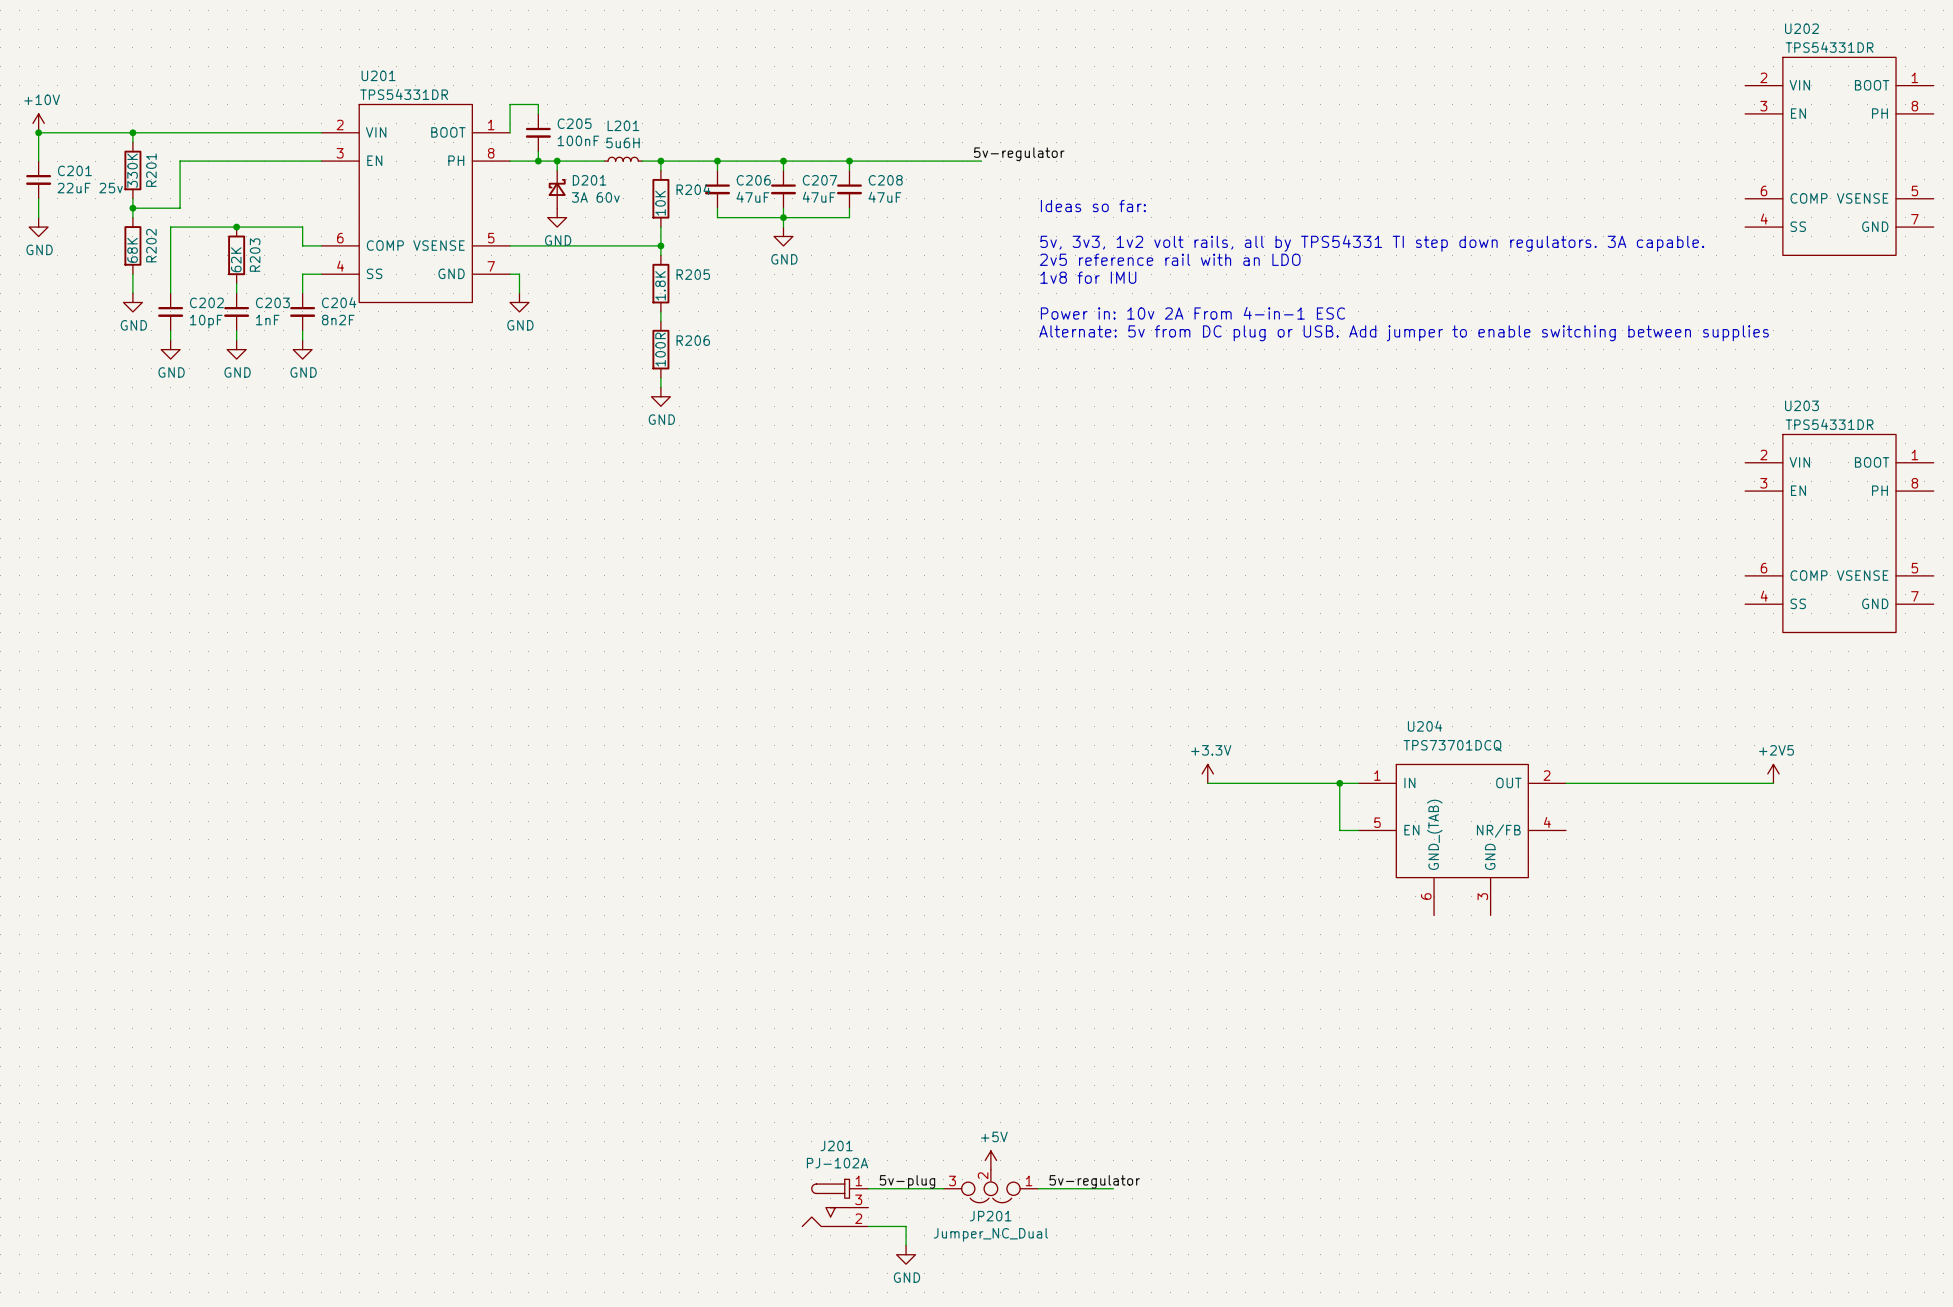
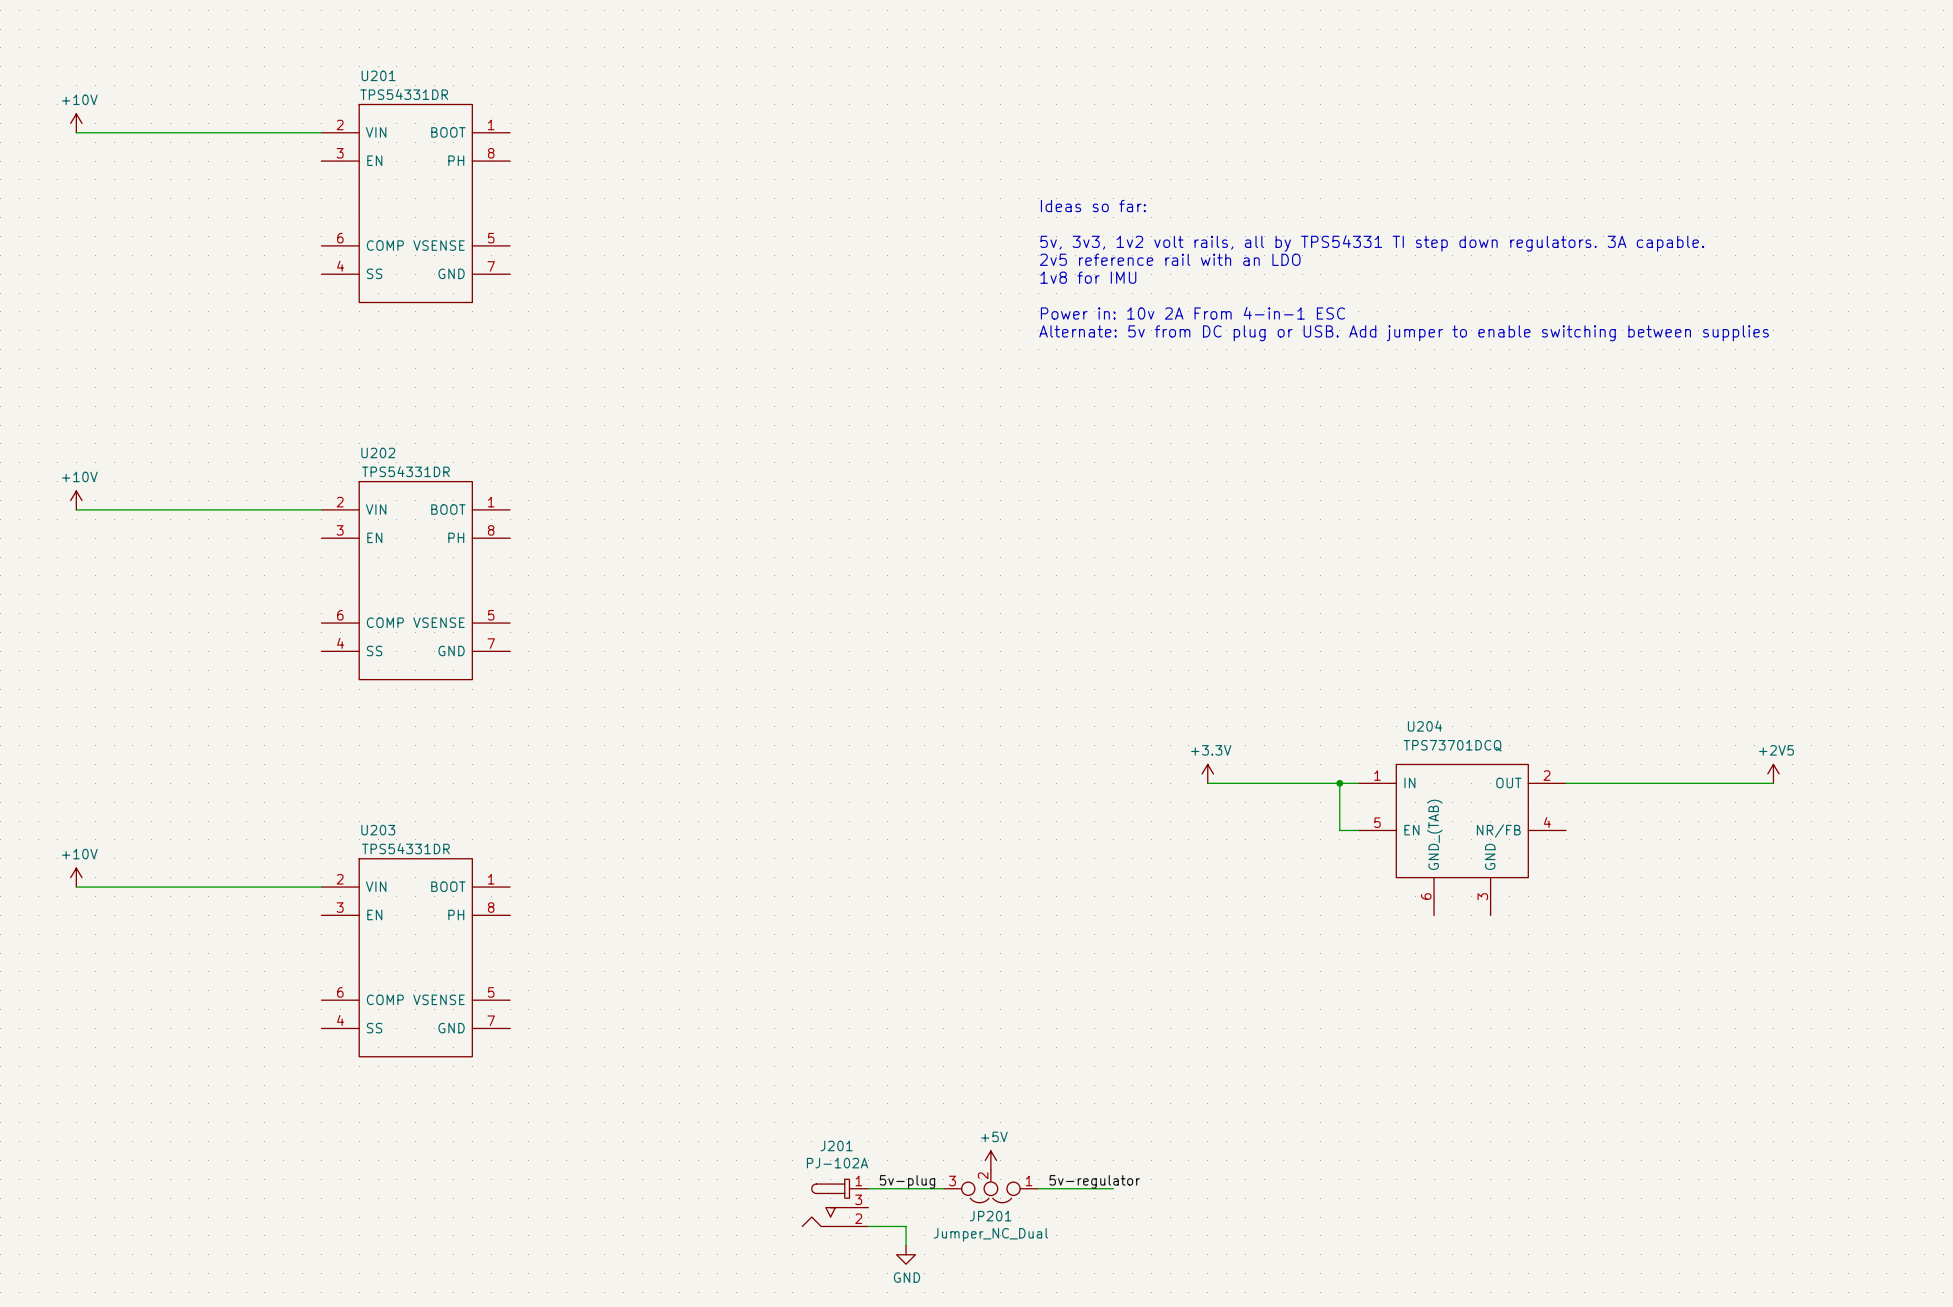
wire: (538, 113) (538, 104) (510, 104) (510, 132) -> none
power symbol position: +10V (38, 123) -> +10V (76, 123)
junction: (38, 132) -> none
wire: (76, 132) (38, 132) (38, 161) -> none
wire: (132, 132) (132, 142) -> none
junction: (132, 132) -> none
C205: 100nF (538, 132) -> none
wire: (538, 151) (538, 161) -> none
label: 5v-regulator (1019, 154) -> none
U202 position: (1839, 156) -> (415, 580)
L201: 5u6H (623, 159) -> none
wire: (321, 161) (180, 161) (180, 208) (132, 208) -> none
wire: (510, 161) (604, 161) -> none
junction: (538, 161) -> none
wire: (557, 161) (557, 170) -> none
junction: (557, 161) -> none
wire: (642, 161) (981, 161) -> none
wire: (660, 161) (660, 170) -> none
junction: (660, 161) -> none
wire: (717, 161) (717, 170) -> none
junction: (717, 161) -> none
wire: (783, 161) (783, 170) -> none
junction: (783, 161) -> none
wire: (849, 161) (849, 170) -> none
junction: (849, 161) -> none
R201: 330K (132, 170) -> none
C201: 22uF 25v (38, 179) -> none
D201: 3A 60v (557, 189) -> none
C206: 47uF (717, 189) -> none
C207: 47uF (783, 189) -> none
C208: 47uF (849, 189) -> none
wire: (38, 198) (38, 217) -> none
wire: (132, 198) (132, 217) -> none
R204: 10K (660, 198) -> none
junction: (132, 208) -> none
wire: (717, 208) (717, 217) (849, 217) (849, 208) -> none
wire: (783, 208) (783, 227) -> none
power symbol: GND (557, 217) -> none
junction: (783, 217) -> none
power symbol: GND (38, 227) -> none
junction: (236, 227) -> none
wire: (660, 227) (660, 255) -> none
power symbol: GND (783, 236) -> none
R202: 68K (132, 245) -> none
wire: (321, 245) (302, 245) (302, 227) (170, 227) (170, 293) -> none
wire: (510, 245) (660, 245) -> none
junction: (660, 245) -> none
R203: 62K (236, 255) -> none
wire: (132, 274) (132, 293) -> none
wire: (321, 274) (302, 274) (302, 293) -> none
wire: (510, 274) (519, 274) (519, 293) -> none
wire: (236, 283) (236, 293) -> none
R205: 1.8K (660, 283) -> none
power symbol: GND (132, 302) -> none
power symbol: GND (519, 302) -> none
C202: 10pF (170, 311) -> none
C203: 1nF (236, 311) -> none
C204: 8n2F (302, 311) -> none
wire: (660, 311) (660, 321) -> none
wire: (170, 330) (170, 340) -> none
wire: (236, 330) (236, 340) -> none
wire: (302, 330) (302, 340) -> none
power symbol: GND (170, 349) -> none
power symbol: GND (236, 349) -> none
power symbol: GND (302, 349) -> none
R206: 100R (660, 349) -> none
wire: (660, 377) (660, 387) -> none
power symbol: GND (660, 396) -> none
power symbol: none -> +10V (76, 500)
wire: none -> (76, 509) (321, 509)
U203 position: (1839, 533) -> (415, 957)
power symbol: none -> +10V (76, 877)
wire: none -> (76, 887) (321, 887)

